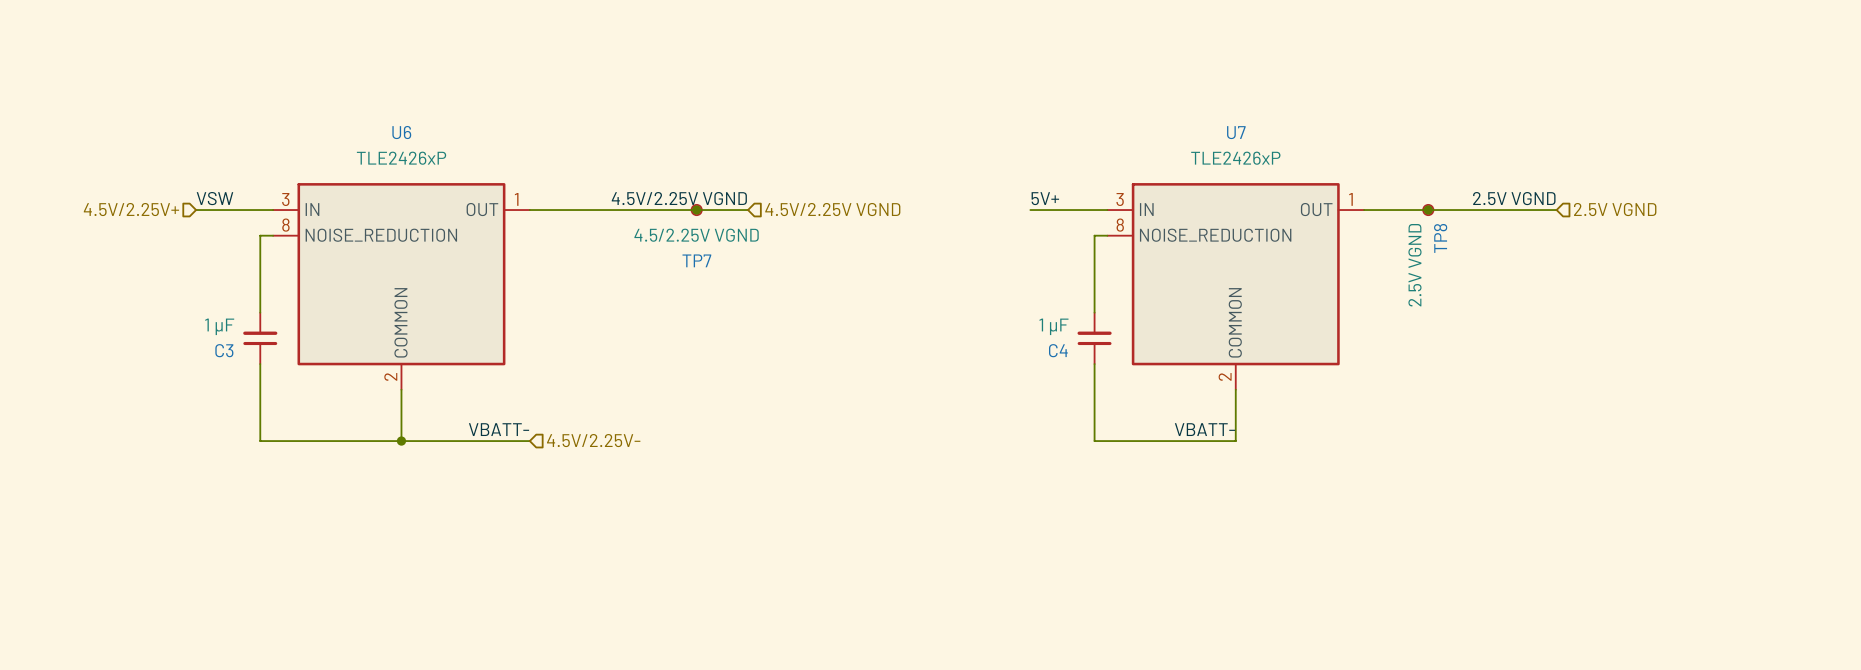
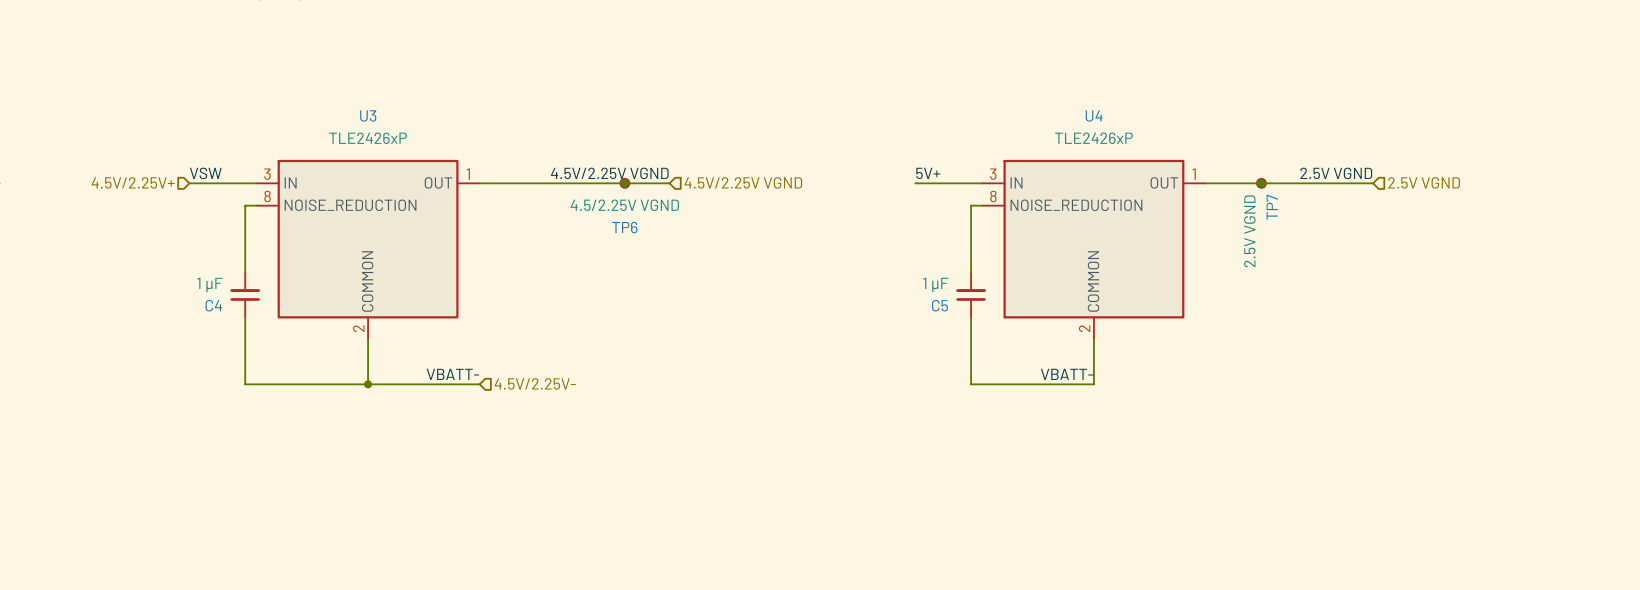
U6 name: U6 (401, 132) -> U3 (368, 115)
U7 name: U7 (1236, 132) -> U4 (1094, 115)
TP8 name: TP8 (1440, 238) -> TP7 (1272, 207)
TP7 name: TP7 (696, 260) -> TP6 (624, 227)
C3 name: C3 (224, 350) -> C4 (213, 305)
C4 name: C4 (1058, 350) -> C5 (939, 305)

